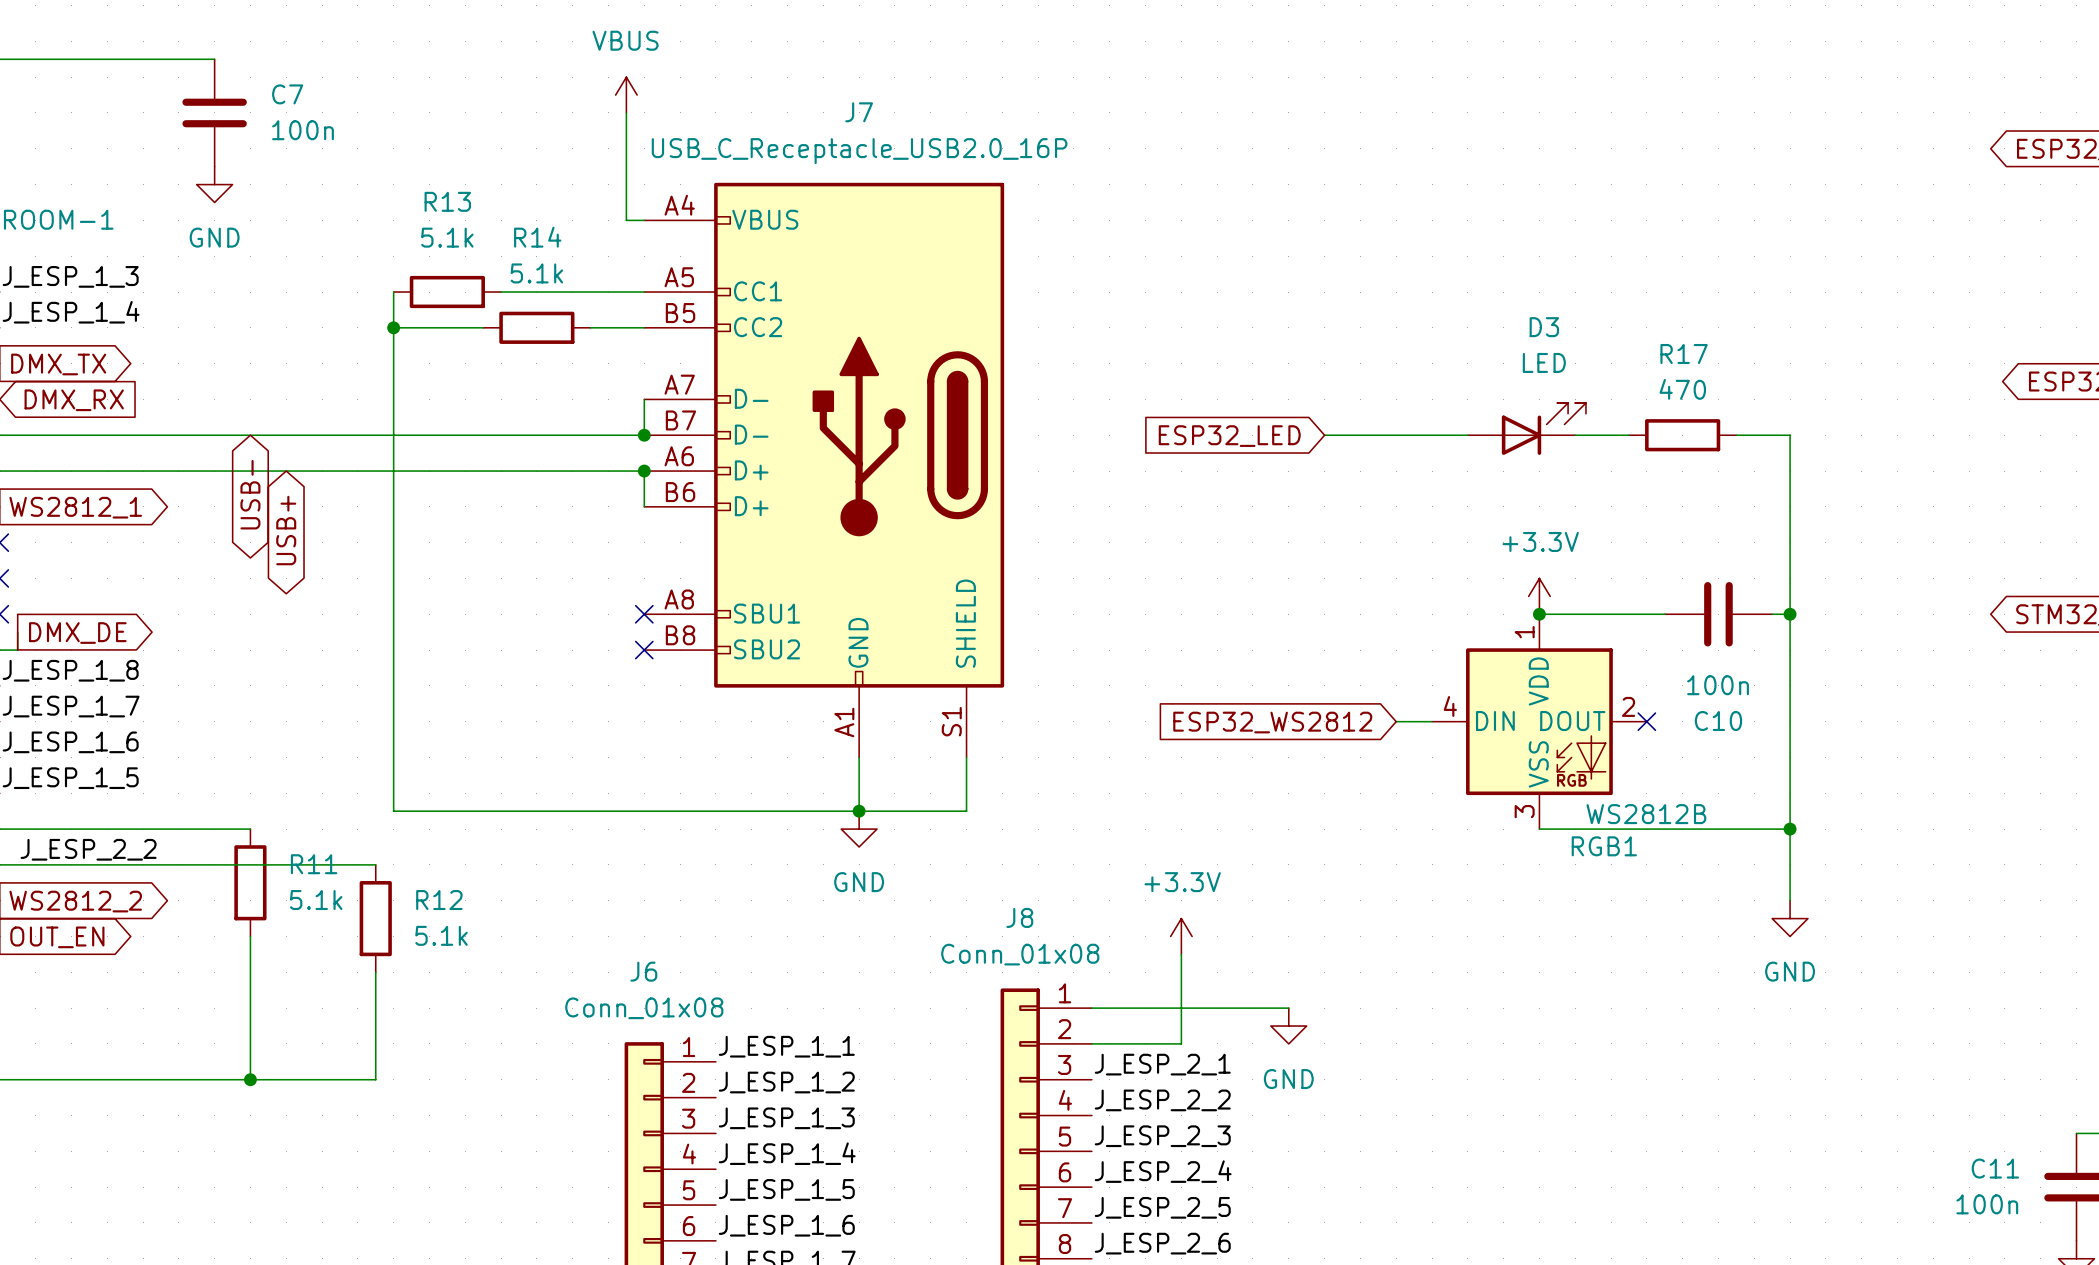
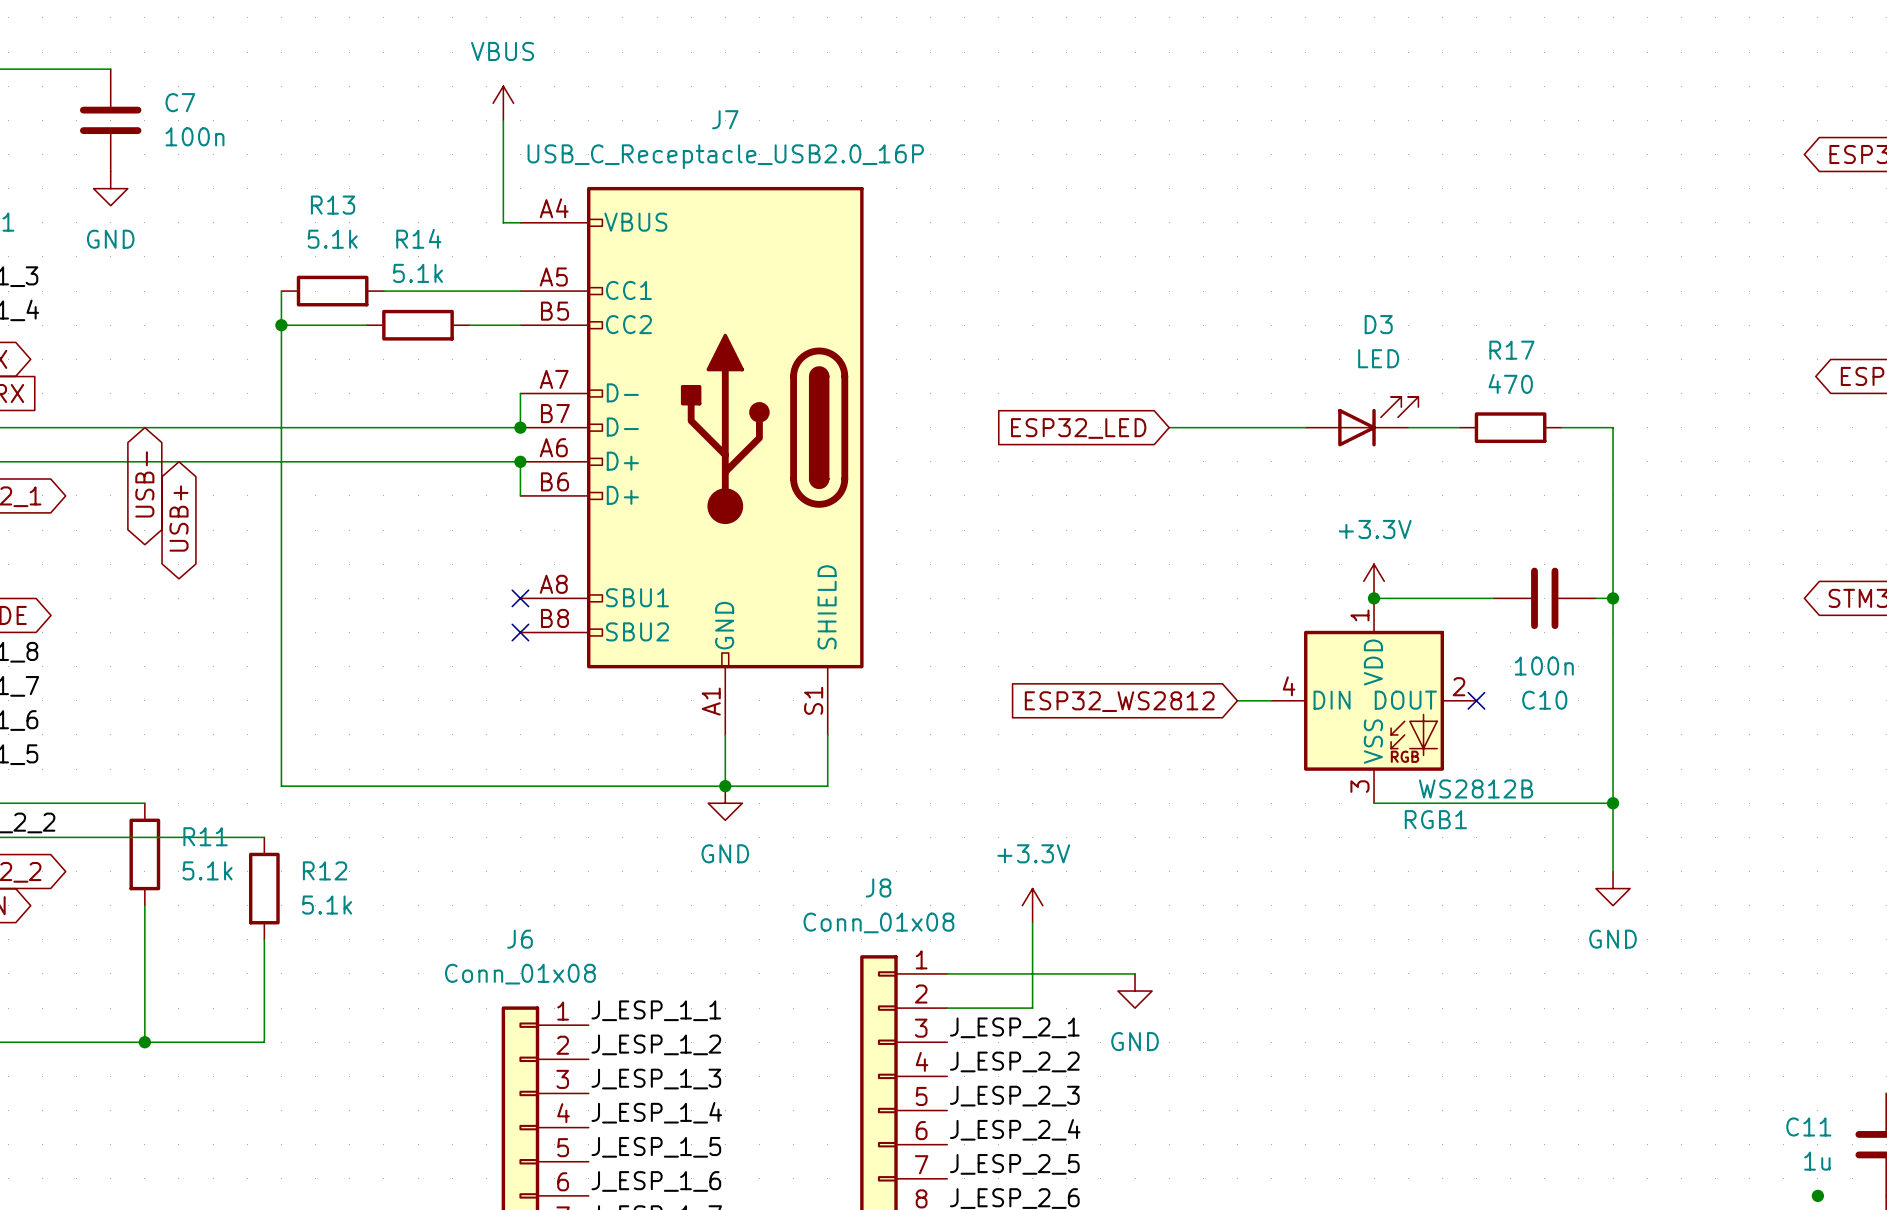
C11 value: 100n (1987, 1204) -> 1u (1817, 1161)
junction: none -> (1817, 1195)

